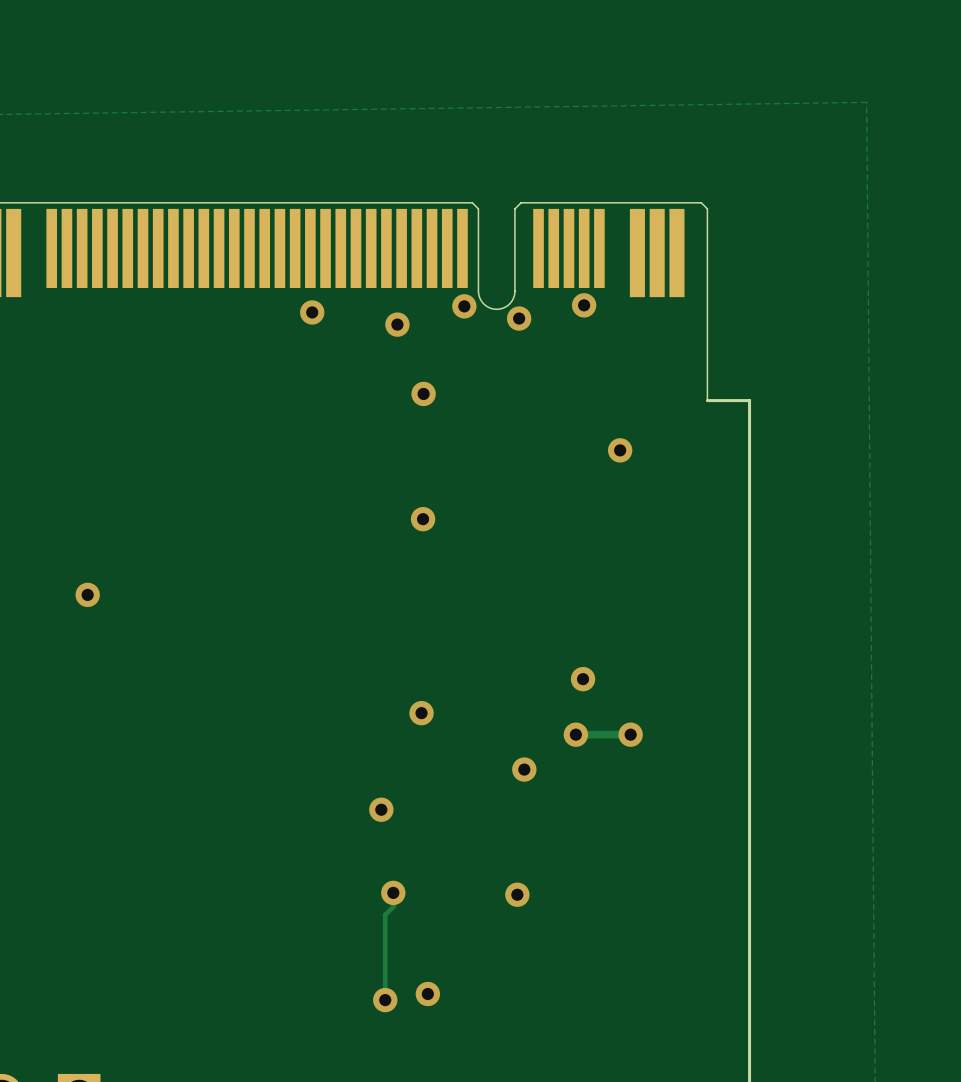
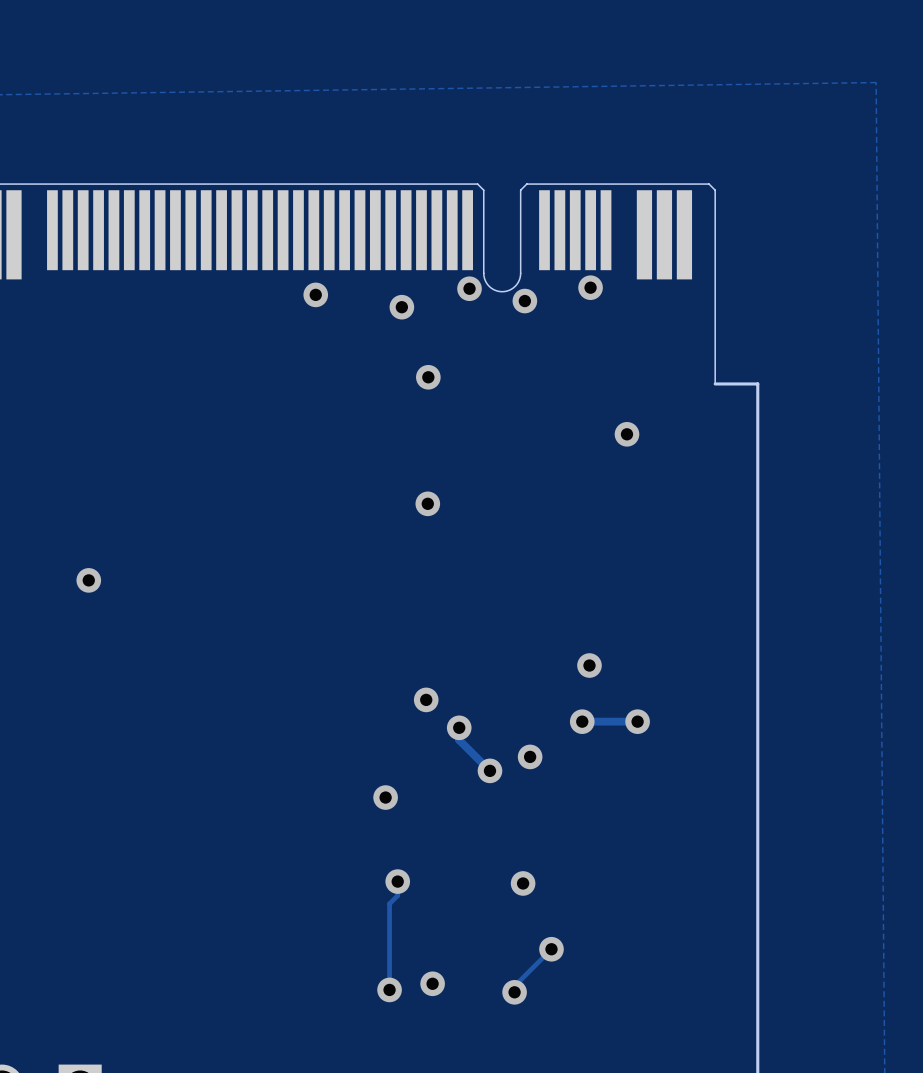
track: none -> (459, 727) (459, 740) (489, 770)
via: none -> (459, 727)
via: none -> (489, 770)
track: none -> (551, 949) (514, 986) (514, 992)
via: none -> (551, 949)
via: none -> (514, 992)

